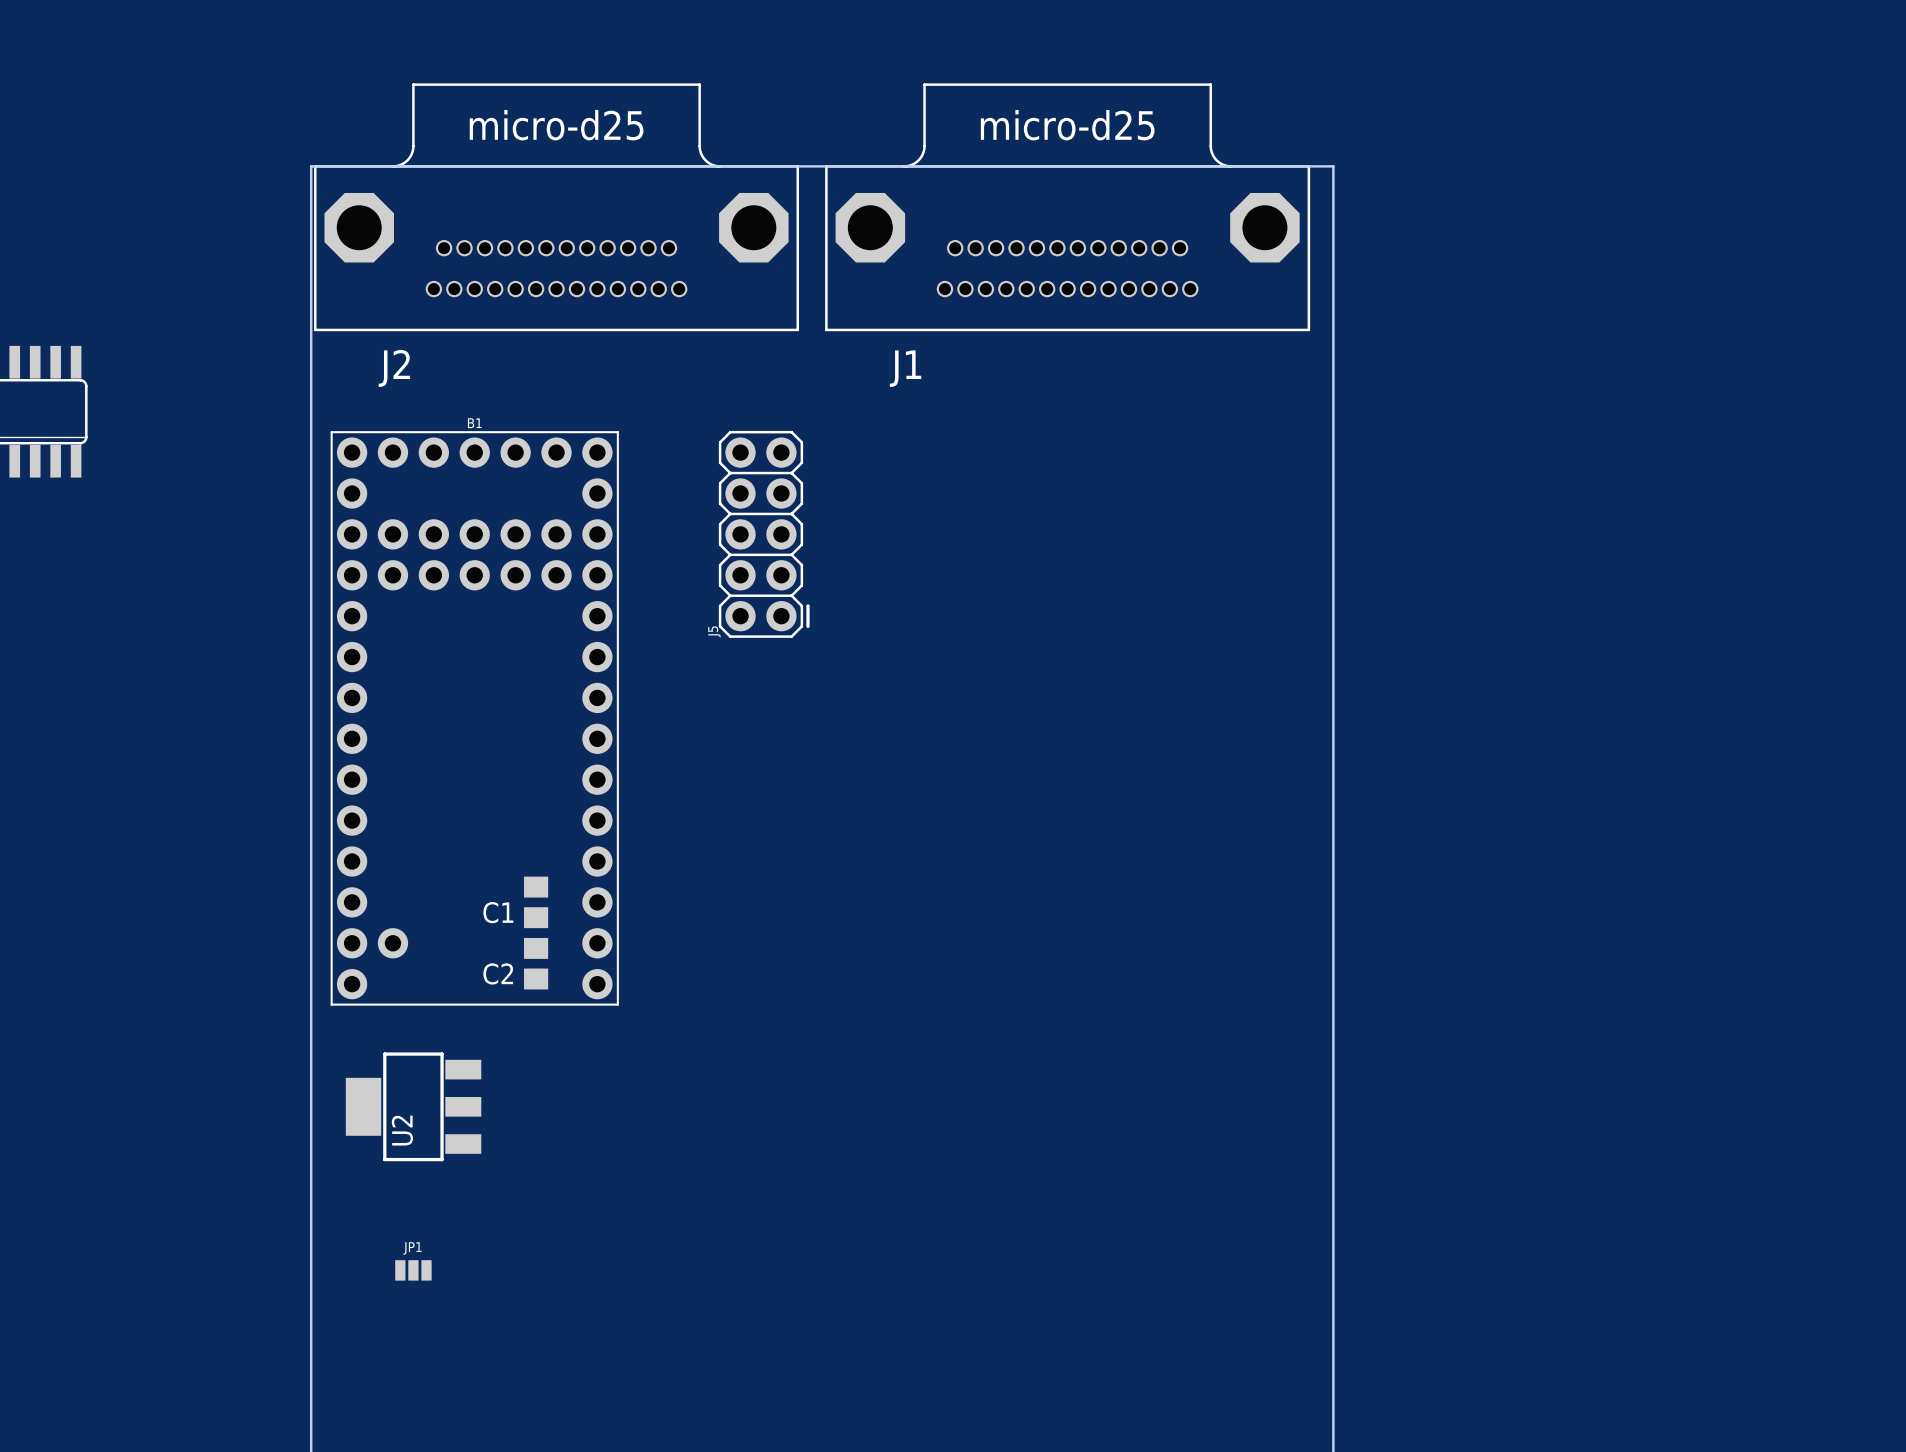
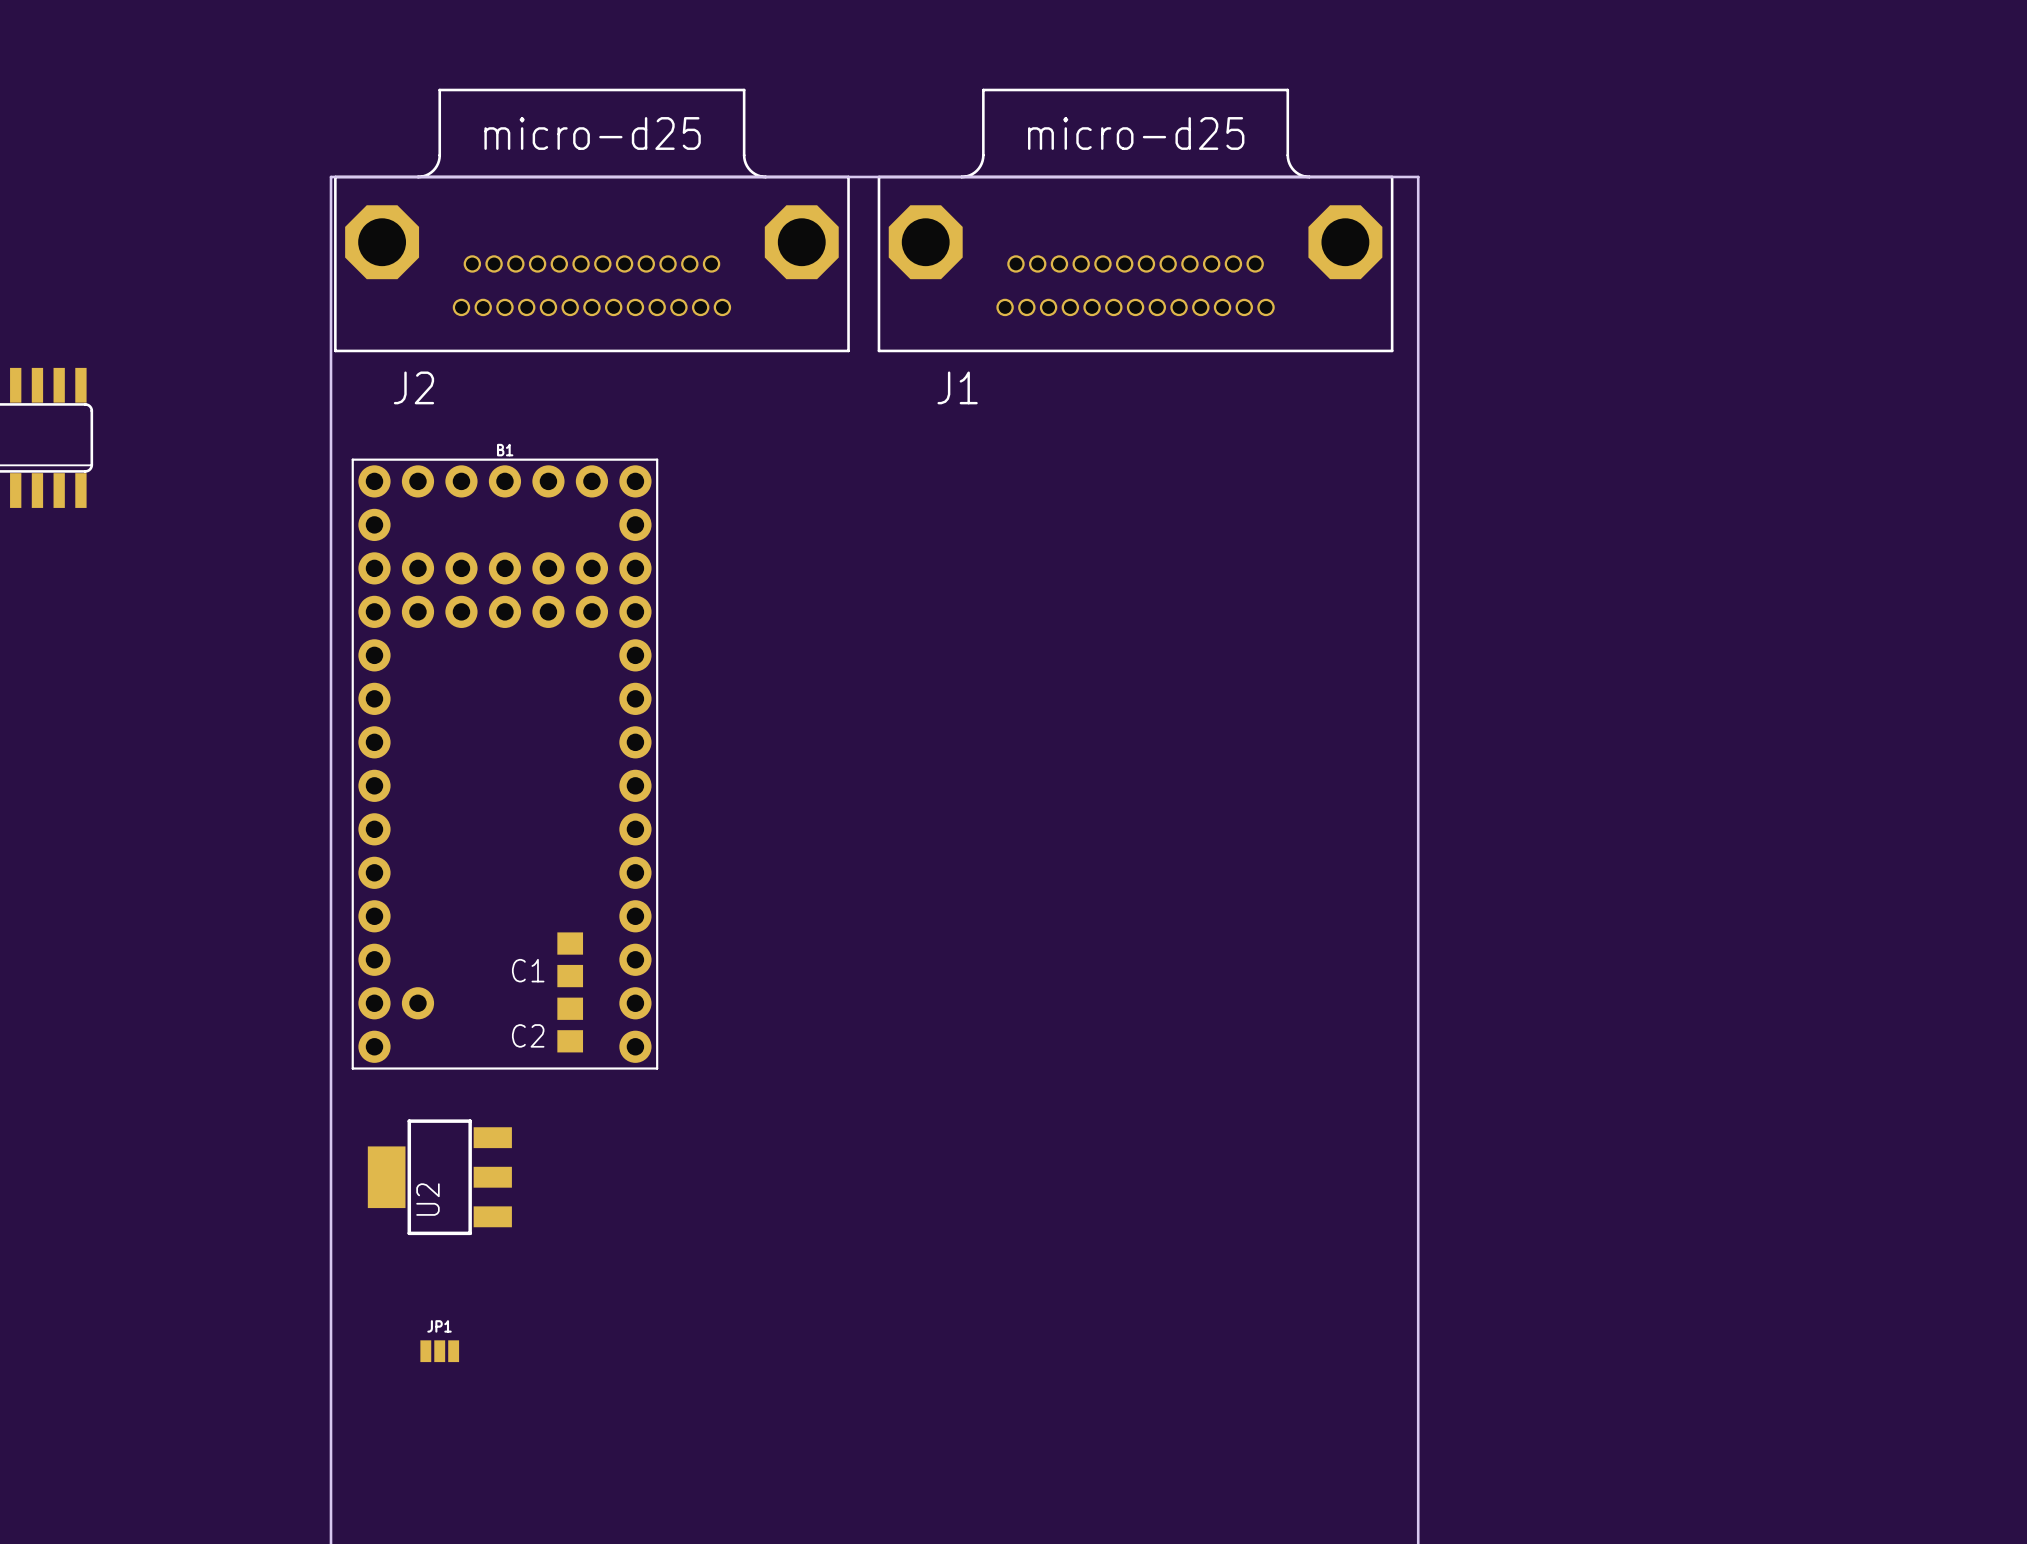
J5: (764, 534) -> none

